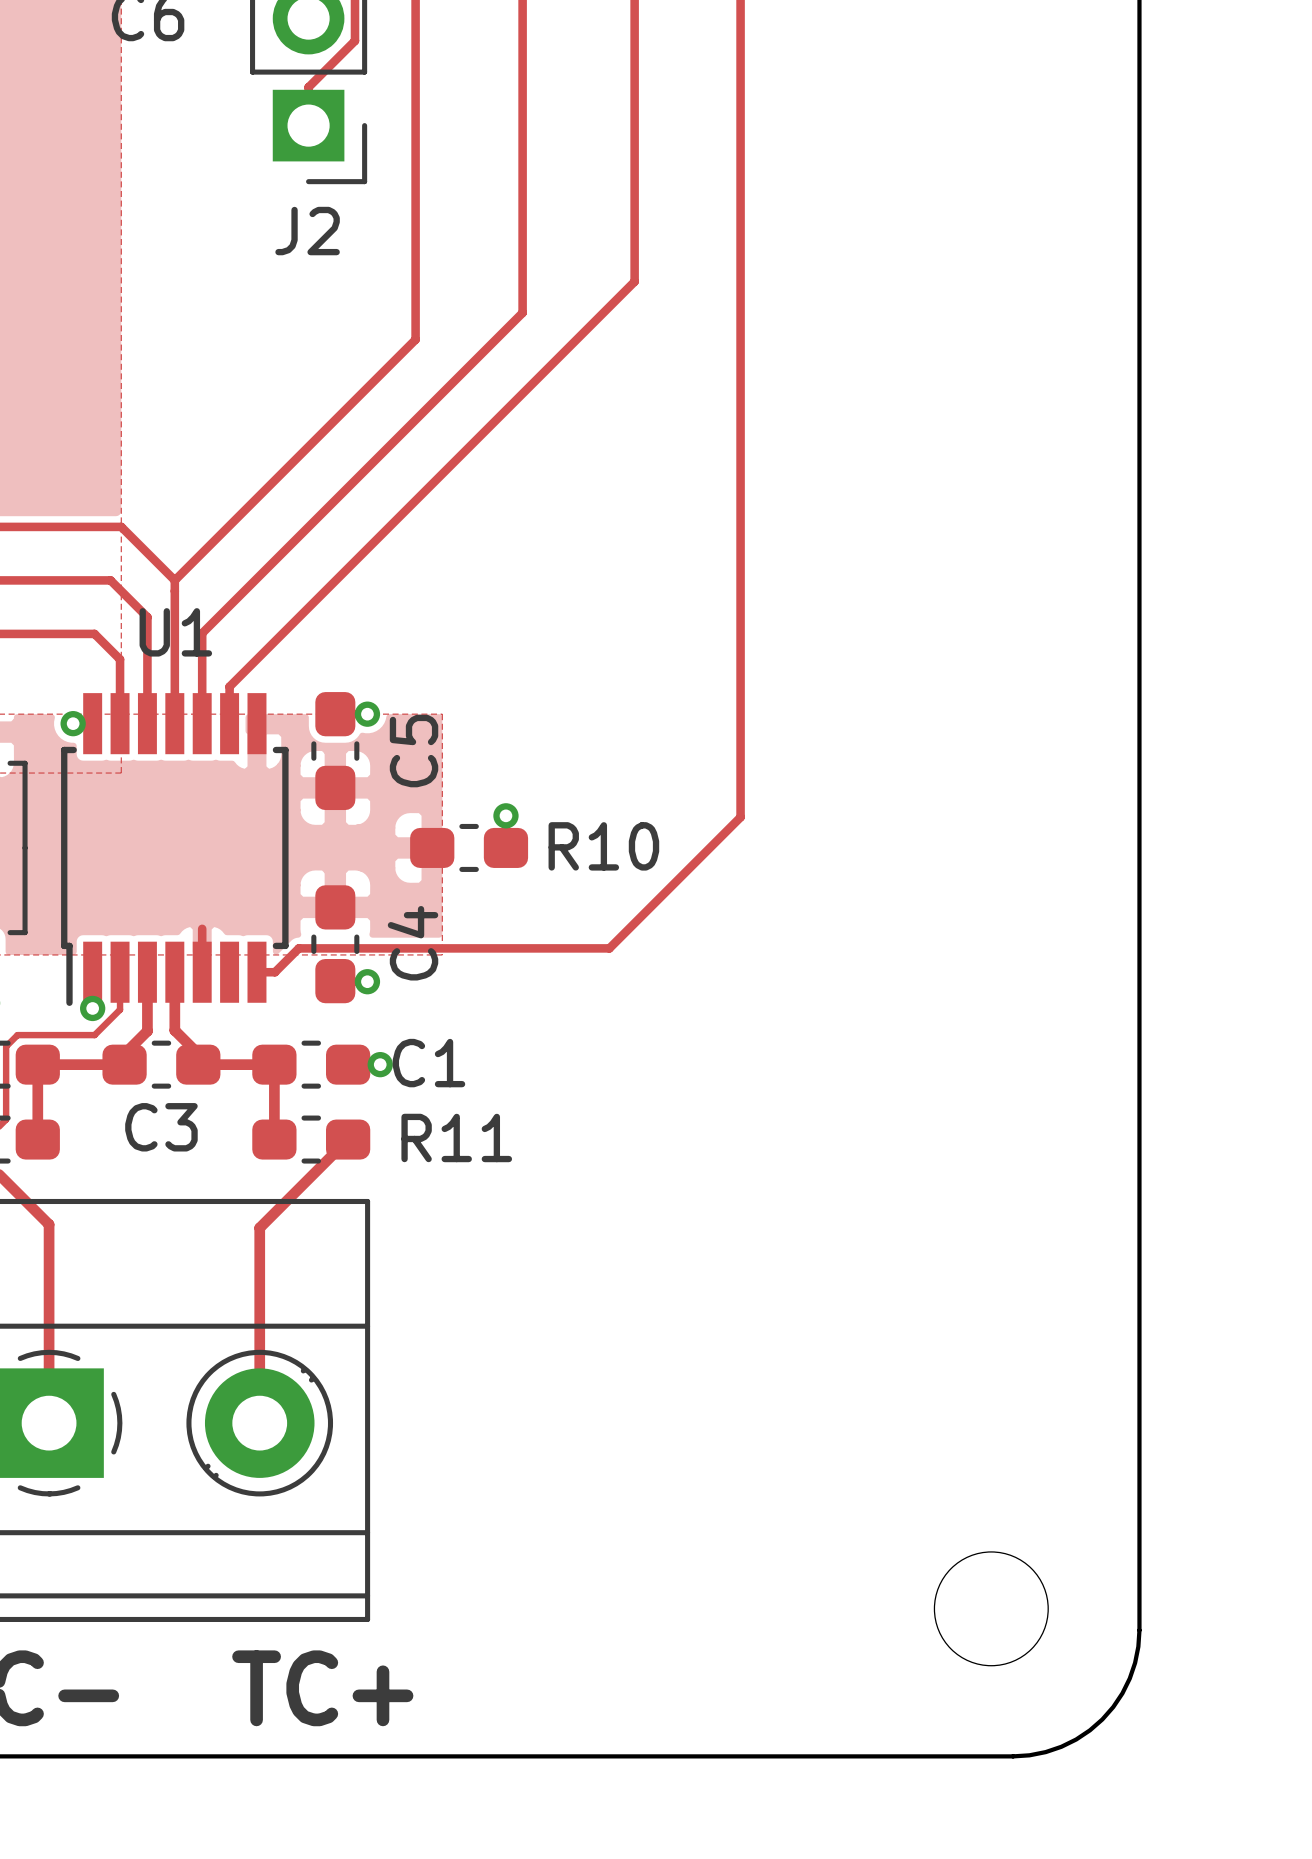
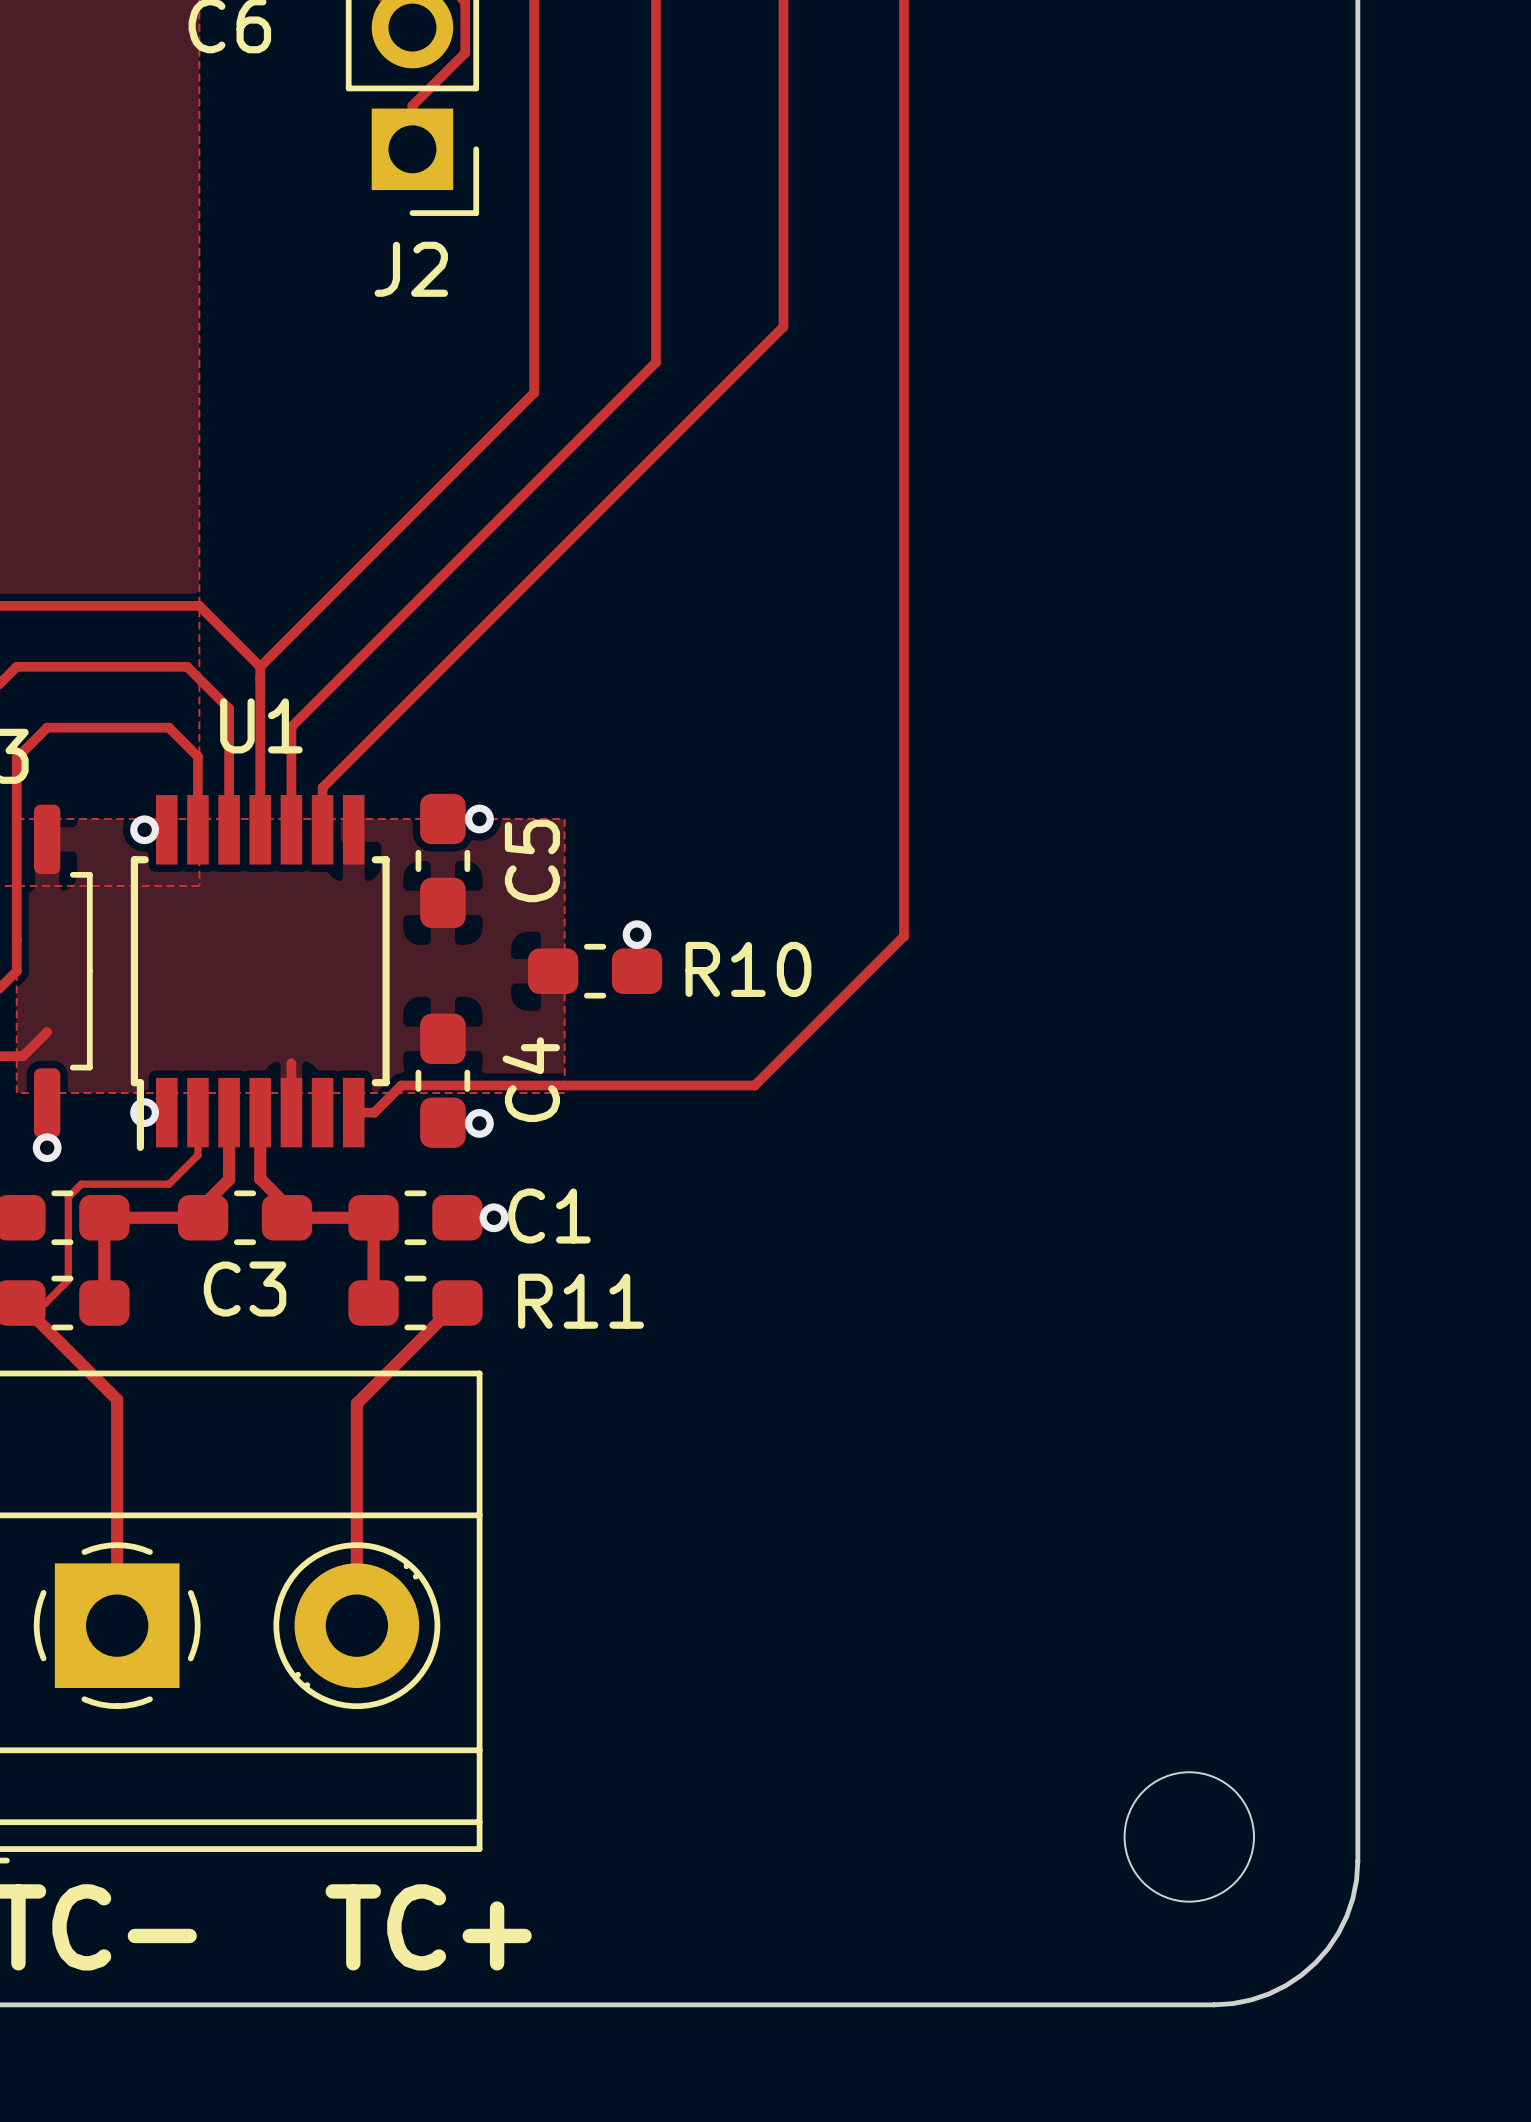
via position: (92, 1008) -> (144, 1112)

